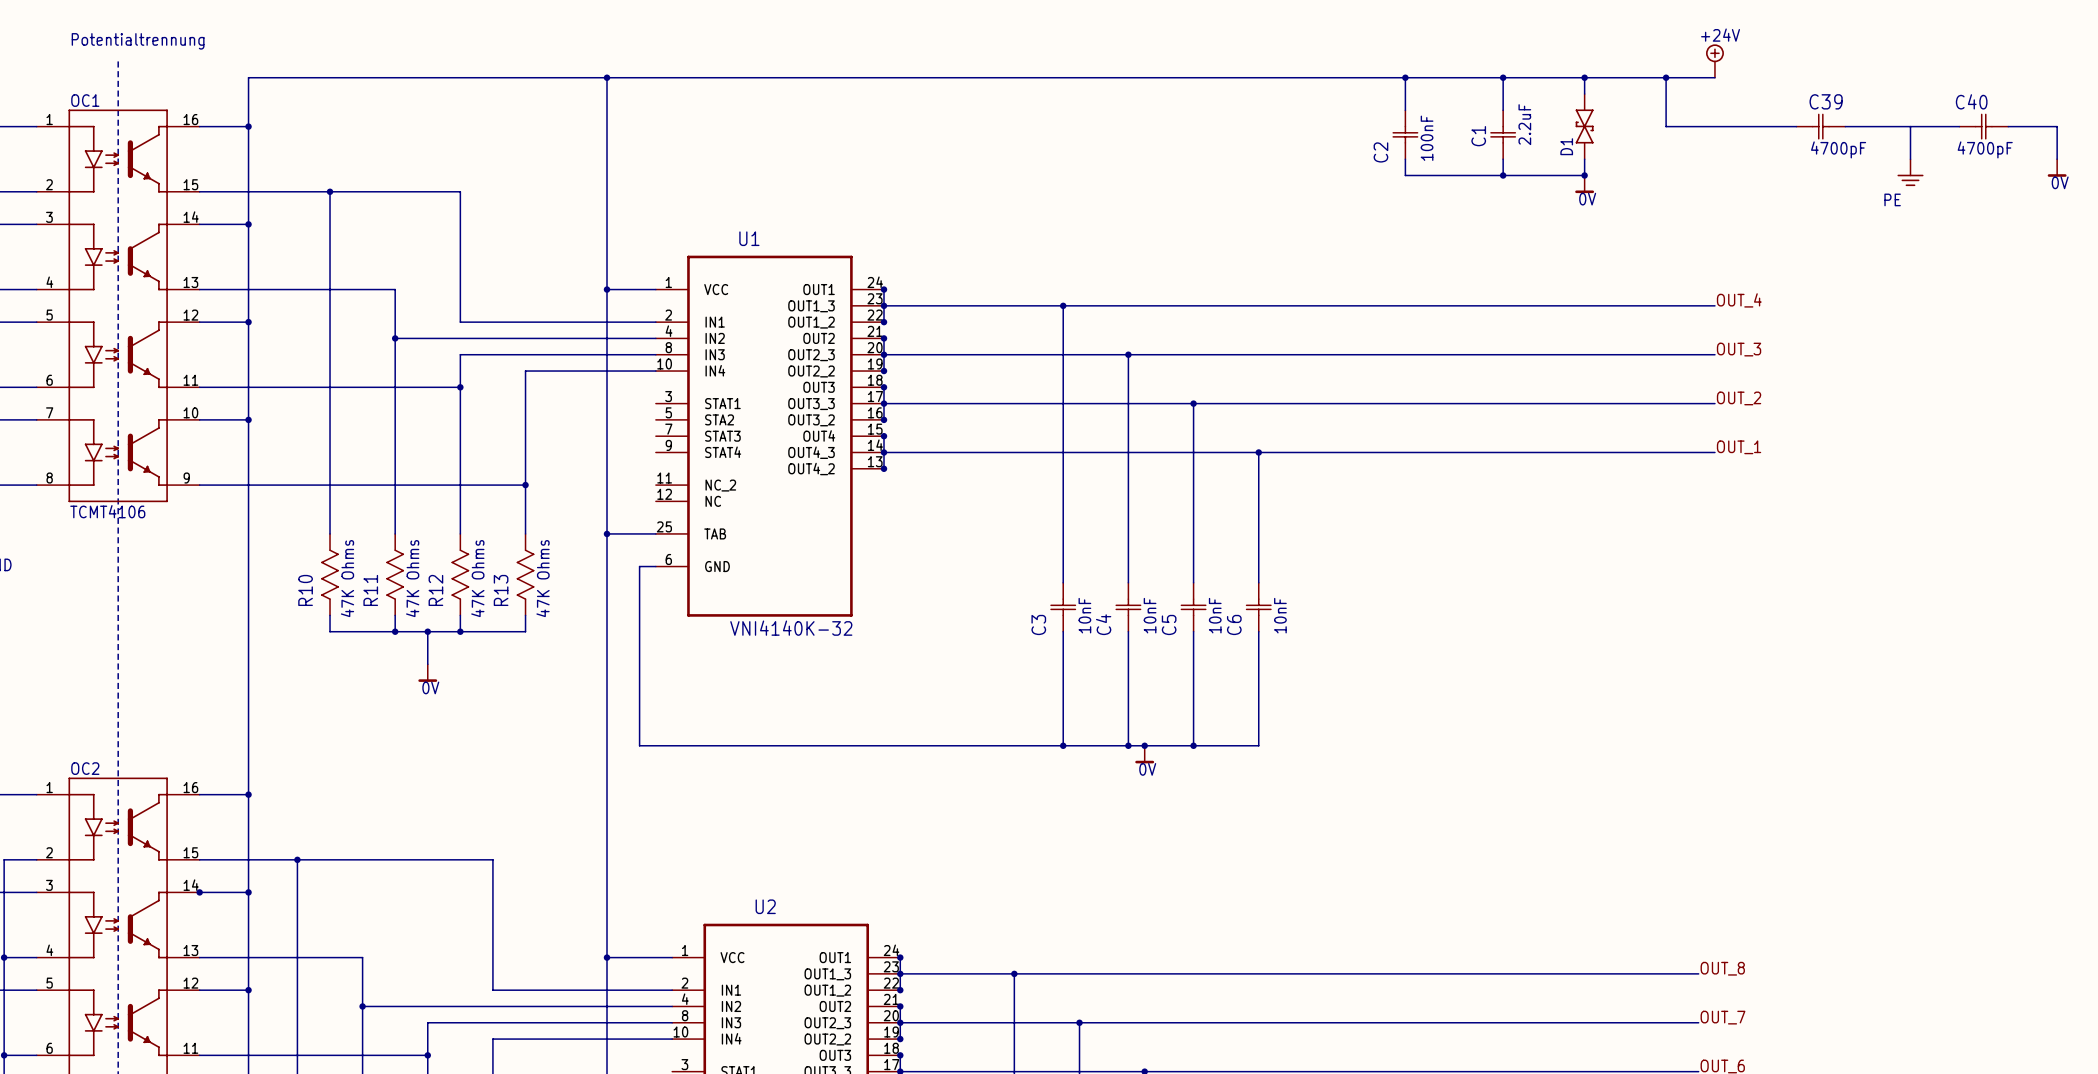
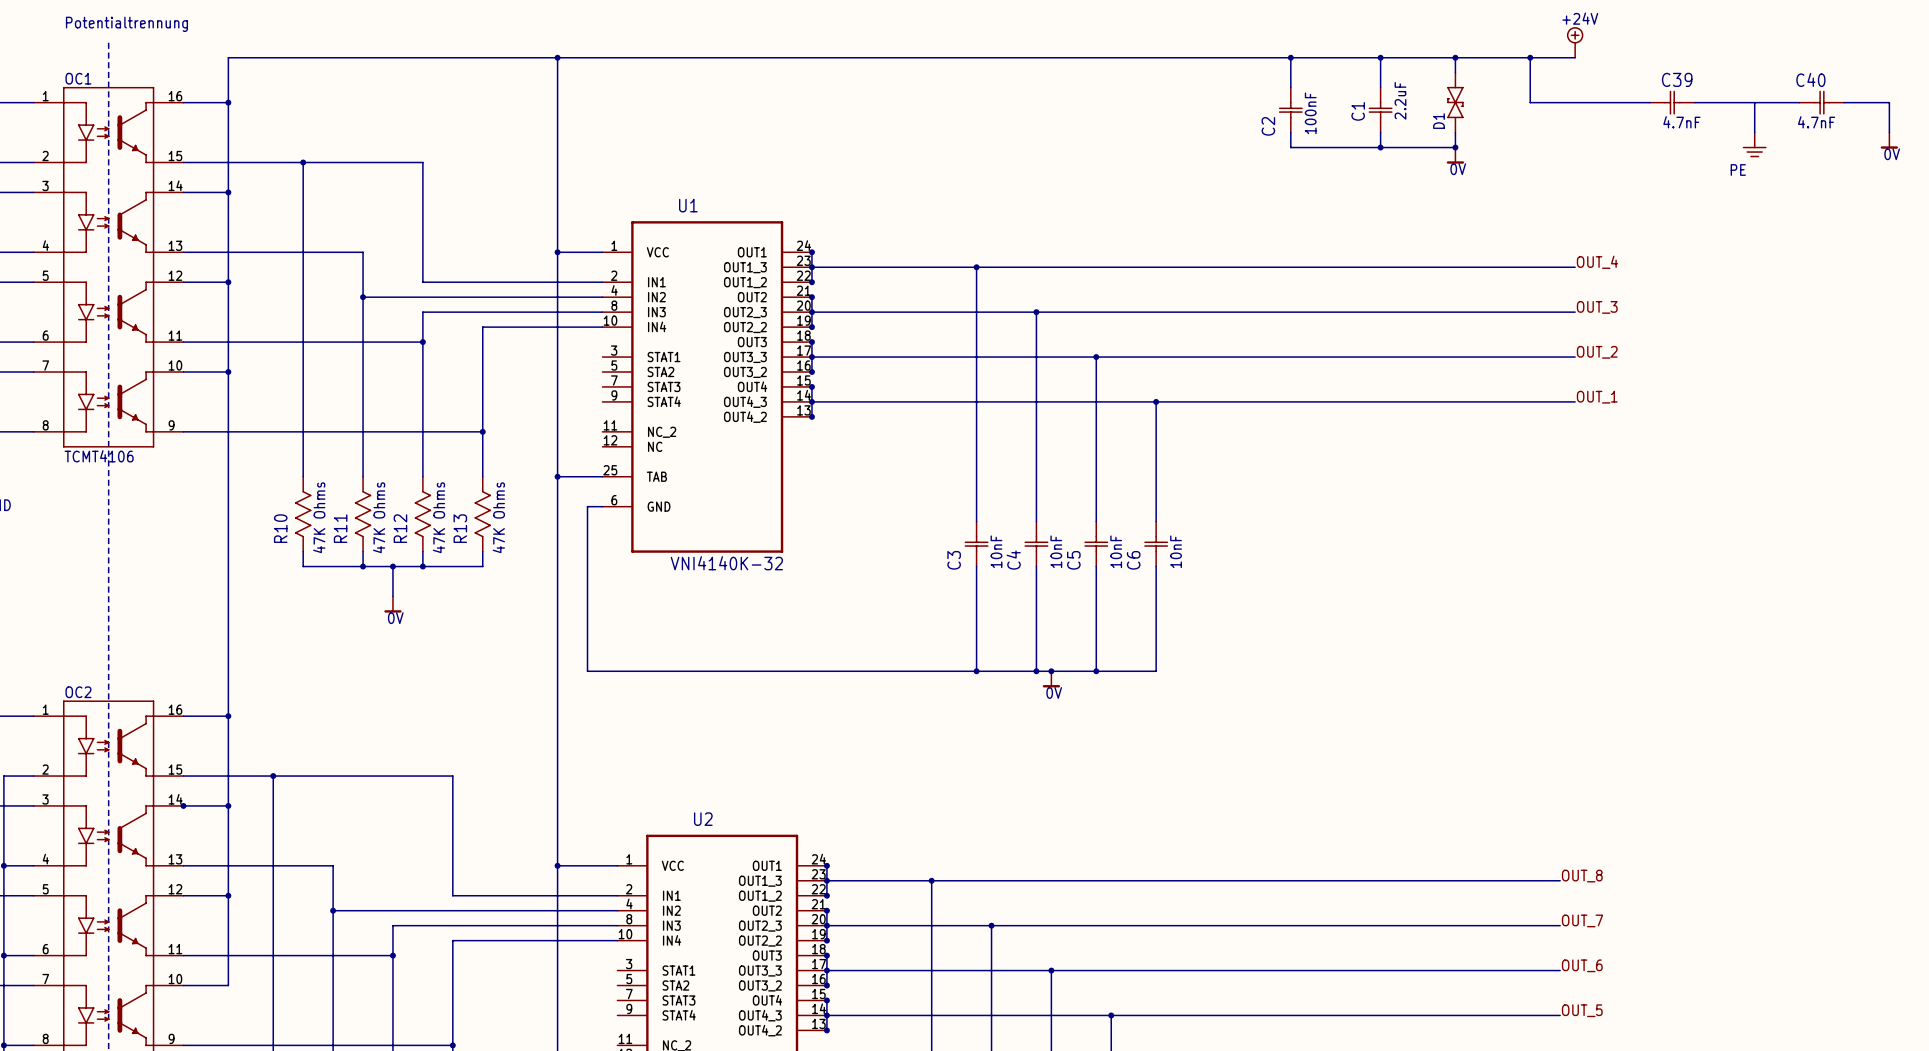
C39 value: 4700pF (1838, 149) -> 4.7nF (1681, 122)
C40 value: 4700pF (1985, 149) -> 4.7nF (1816, 122)

